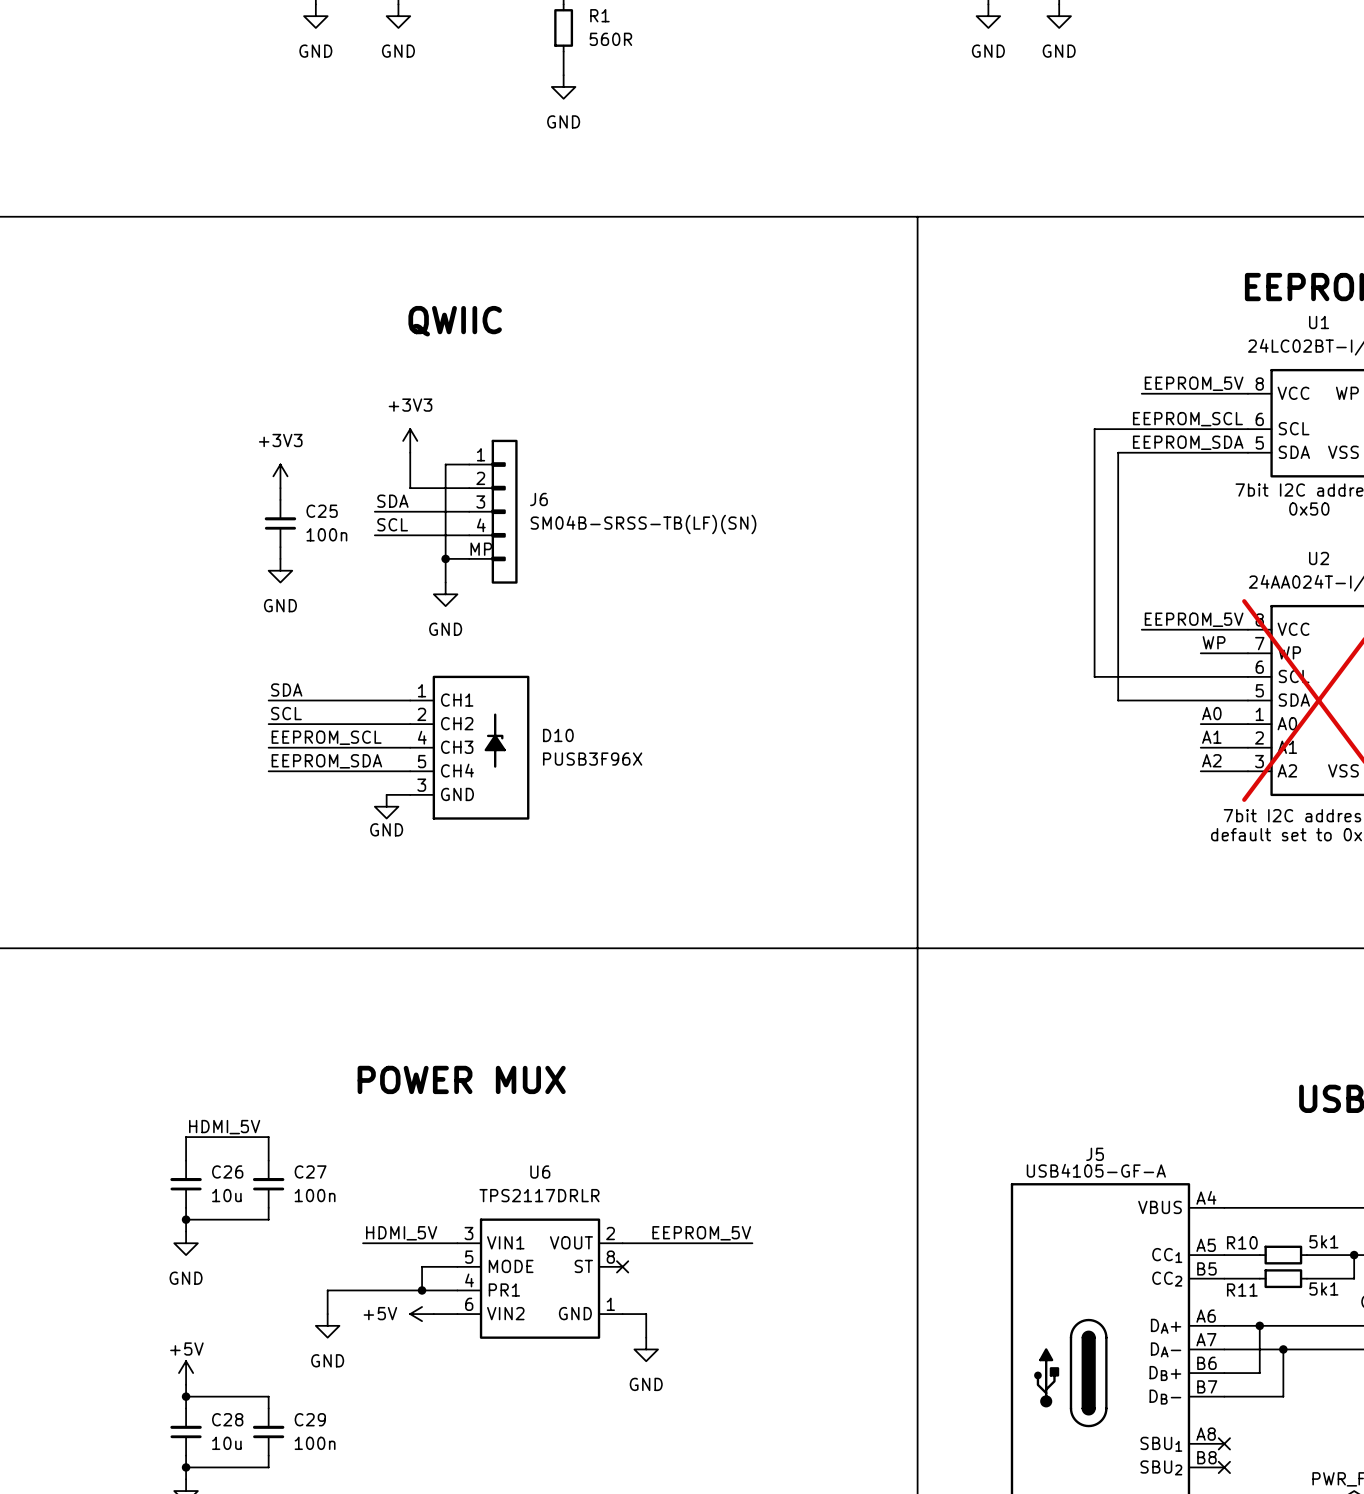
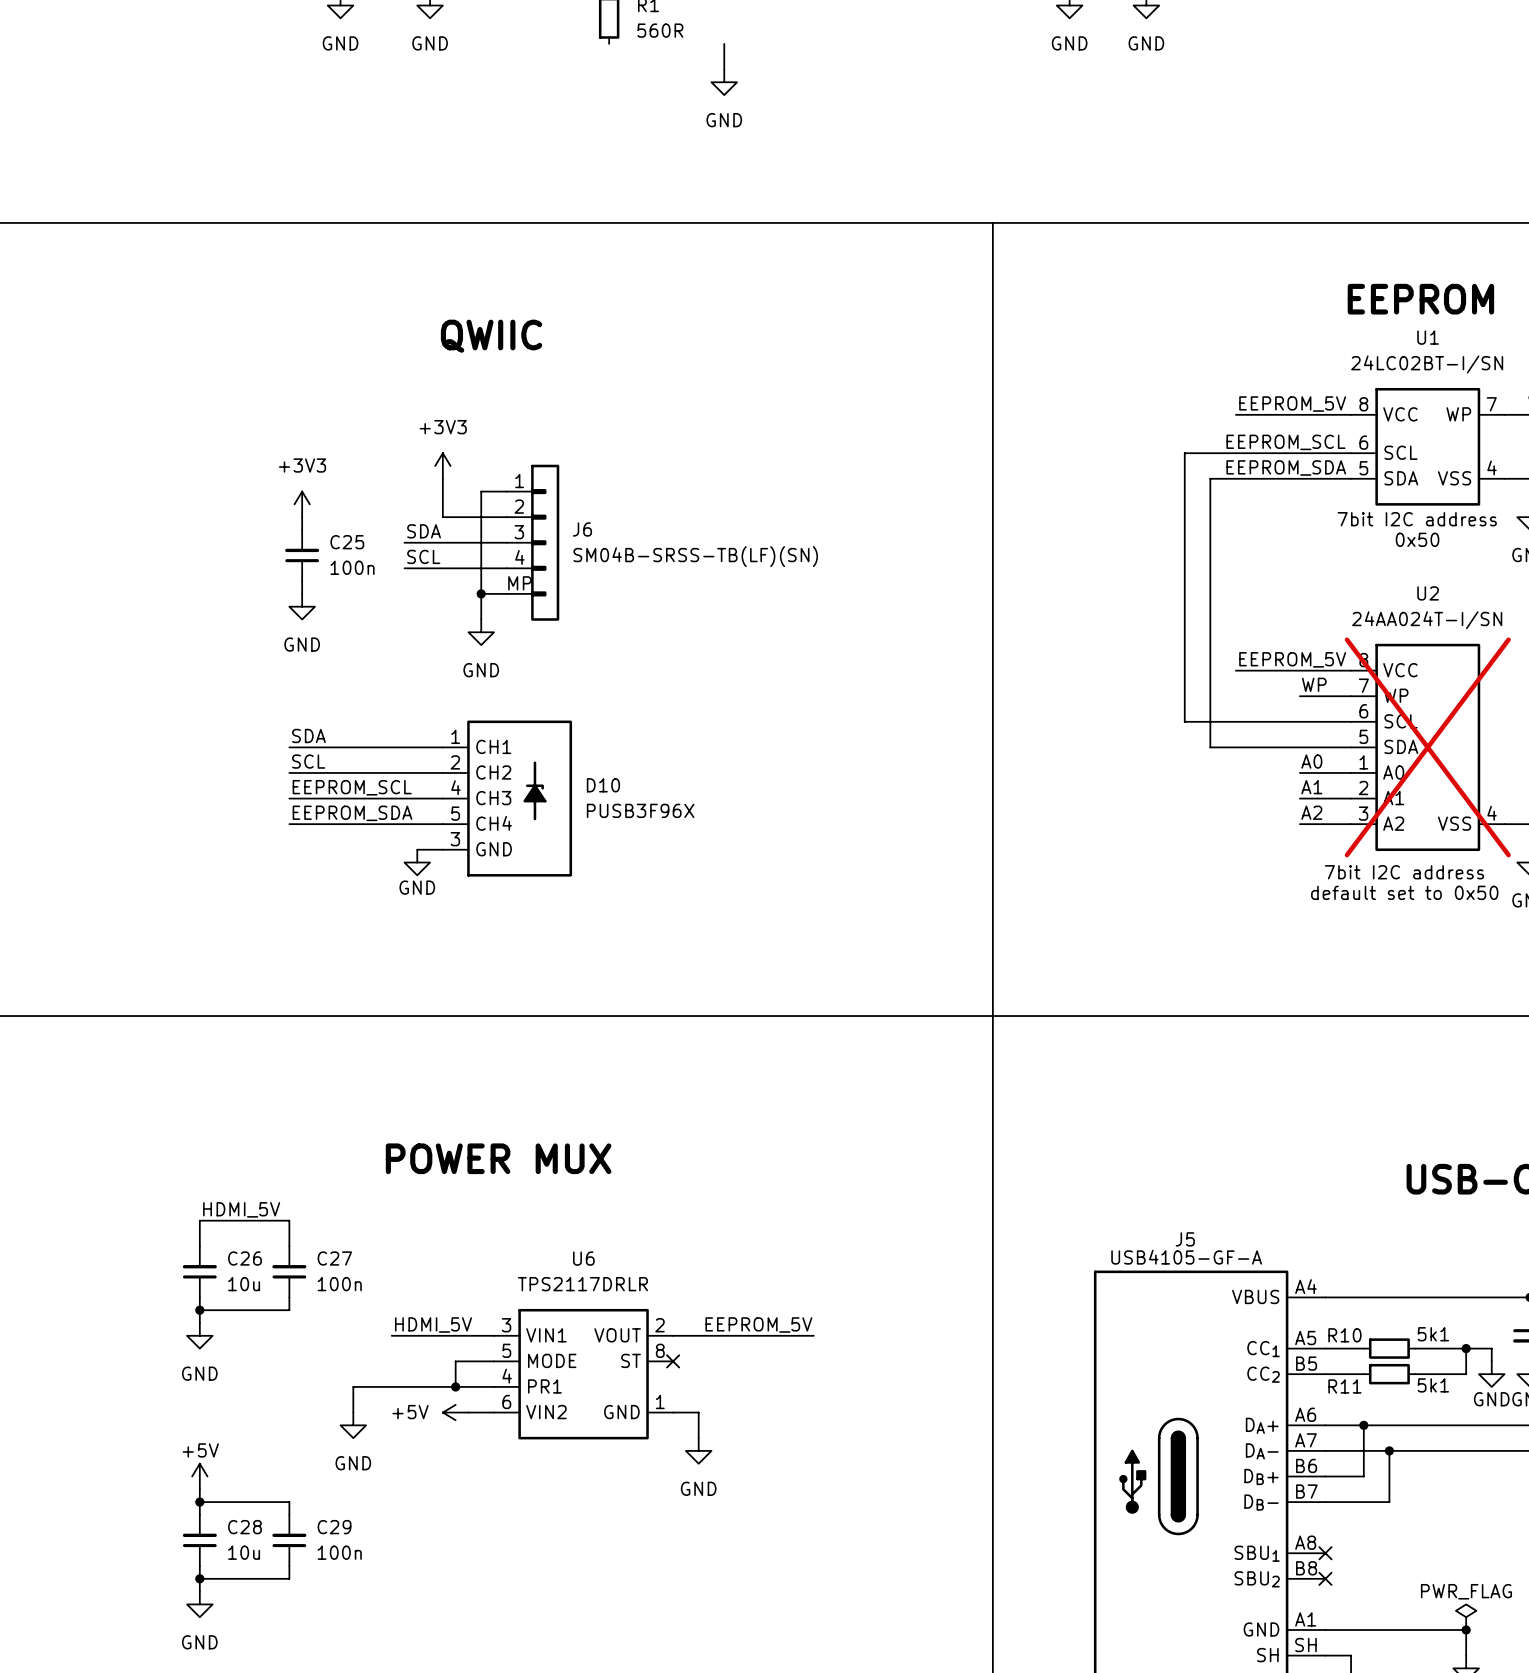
wire: (563, 51) (563, 75) -> (724, 43) (724, 69)
power symbol position: GND (563, 86) -> GND (724, 82)

